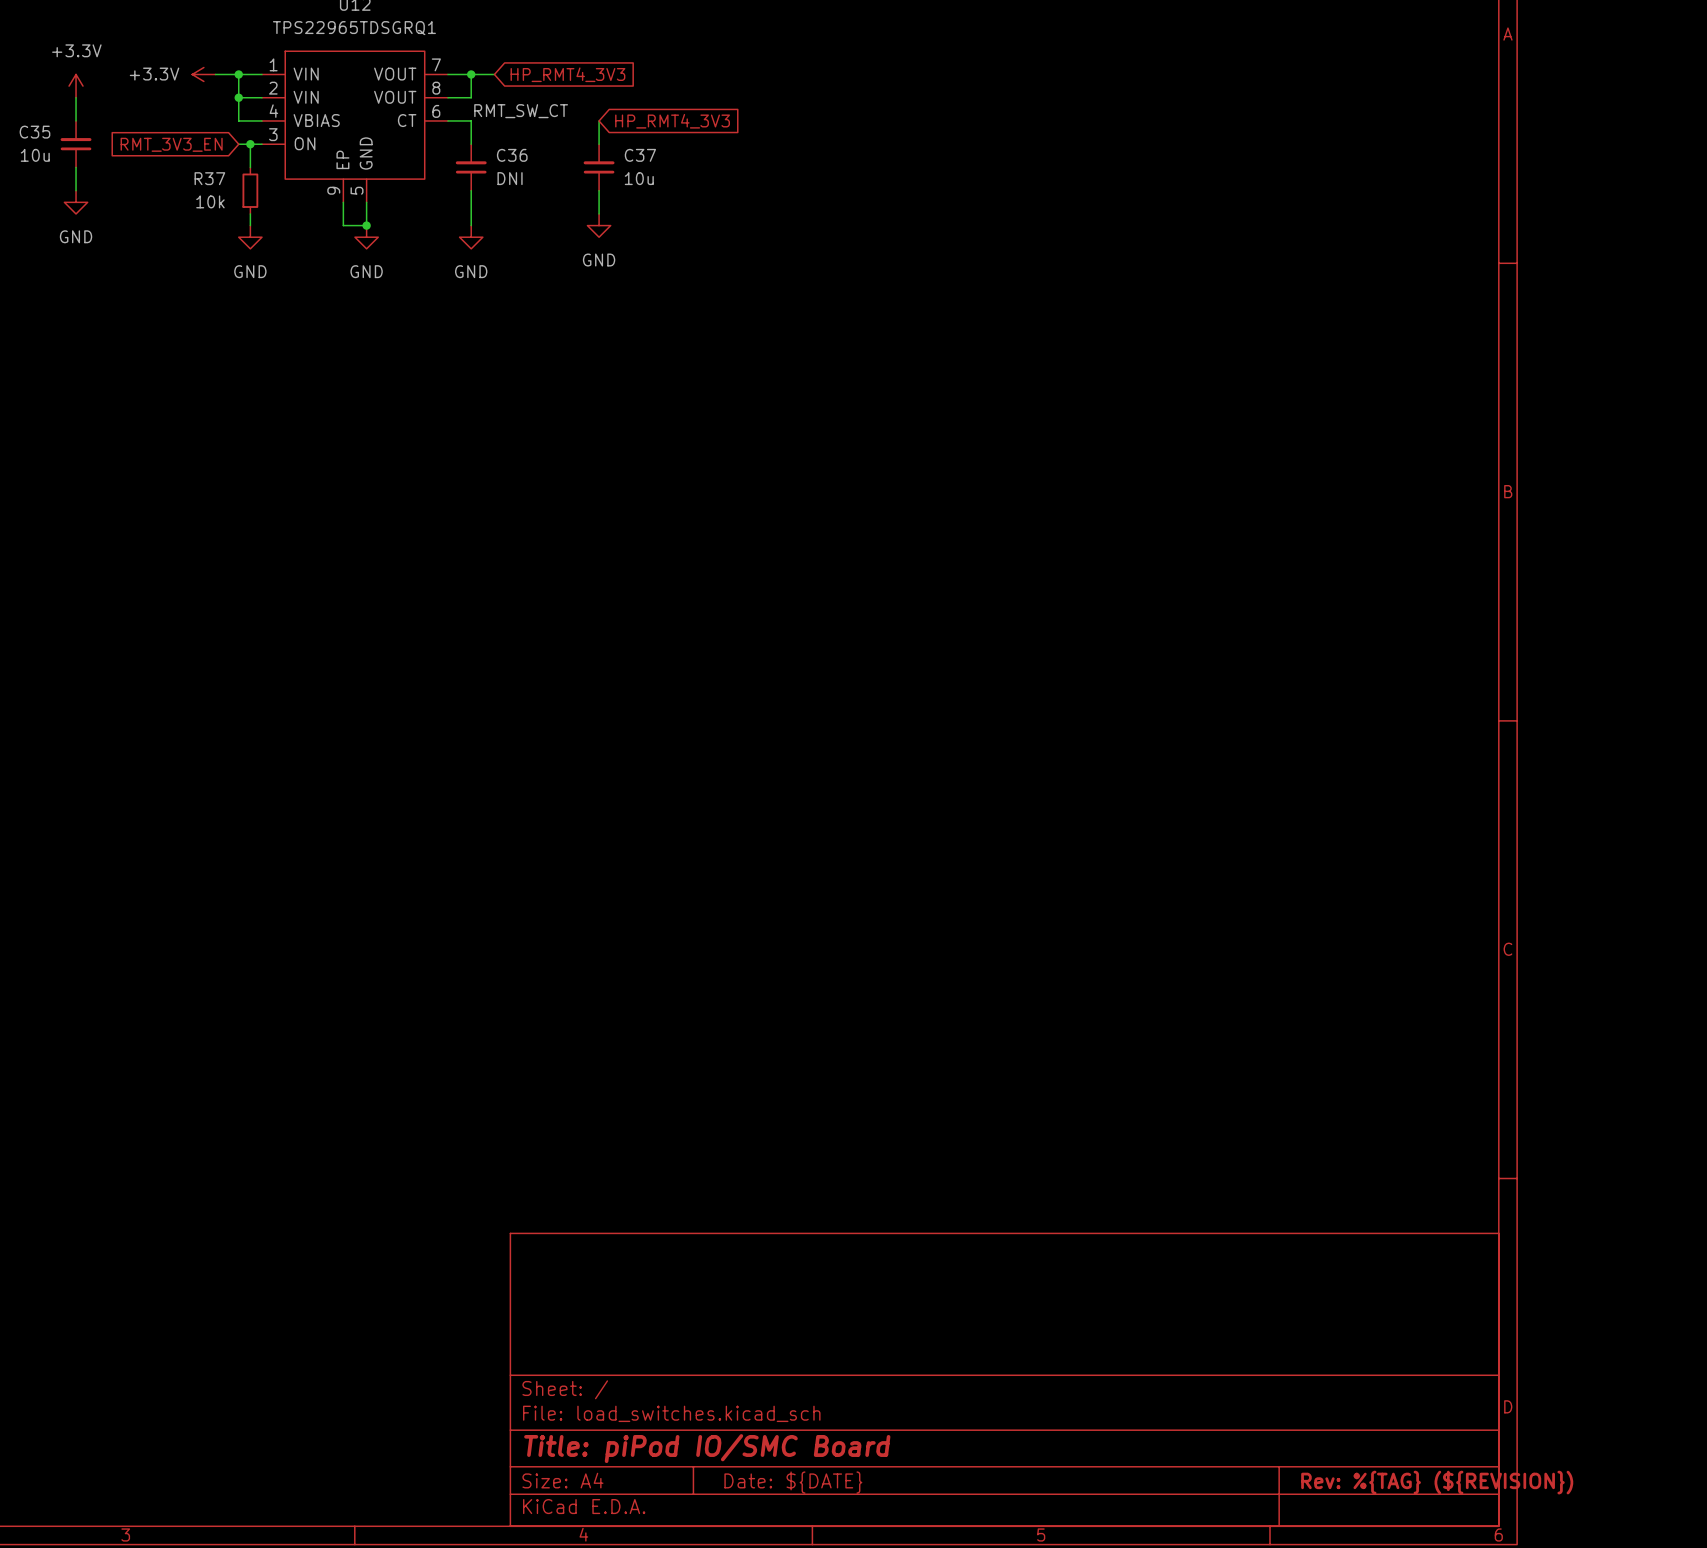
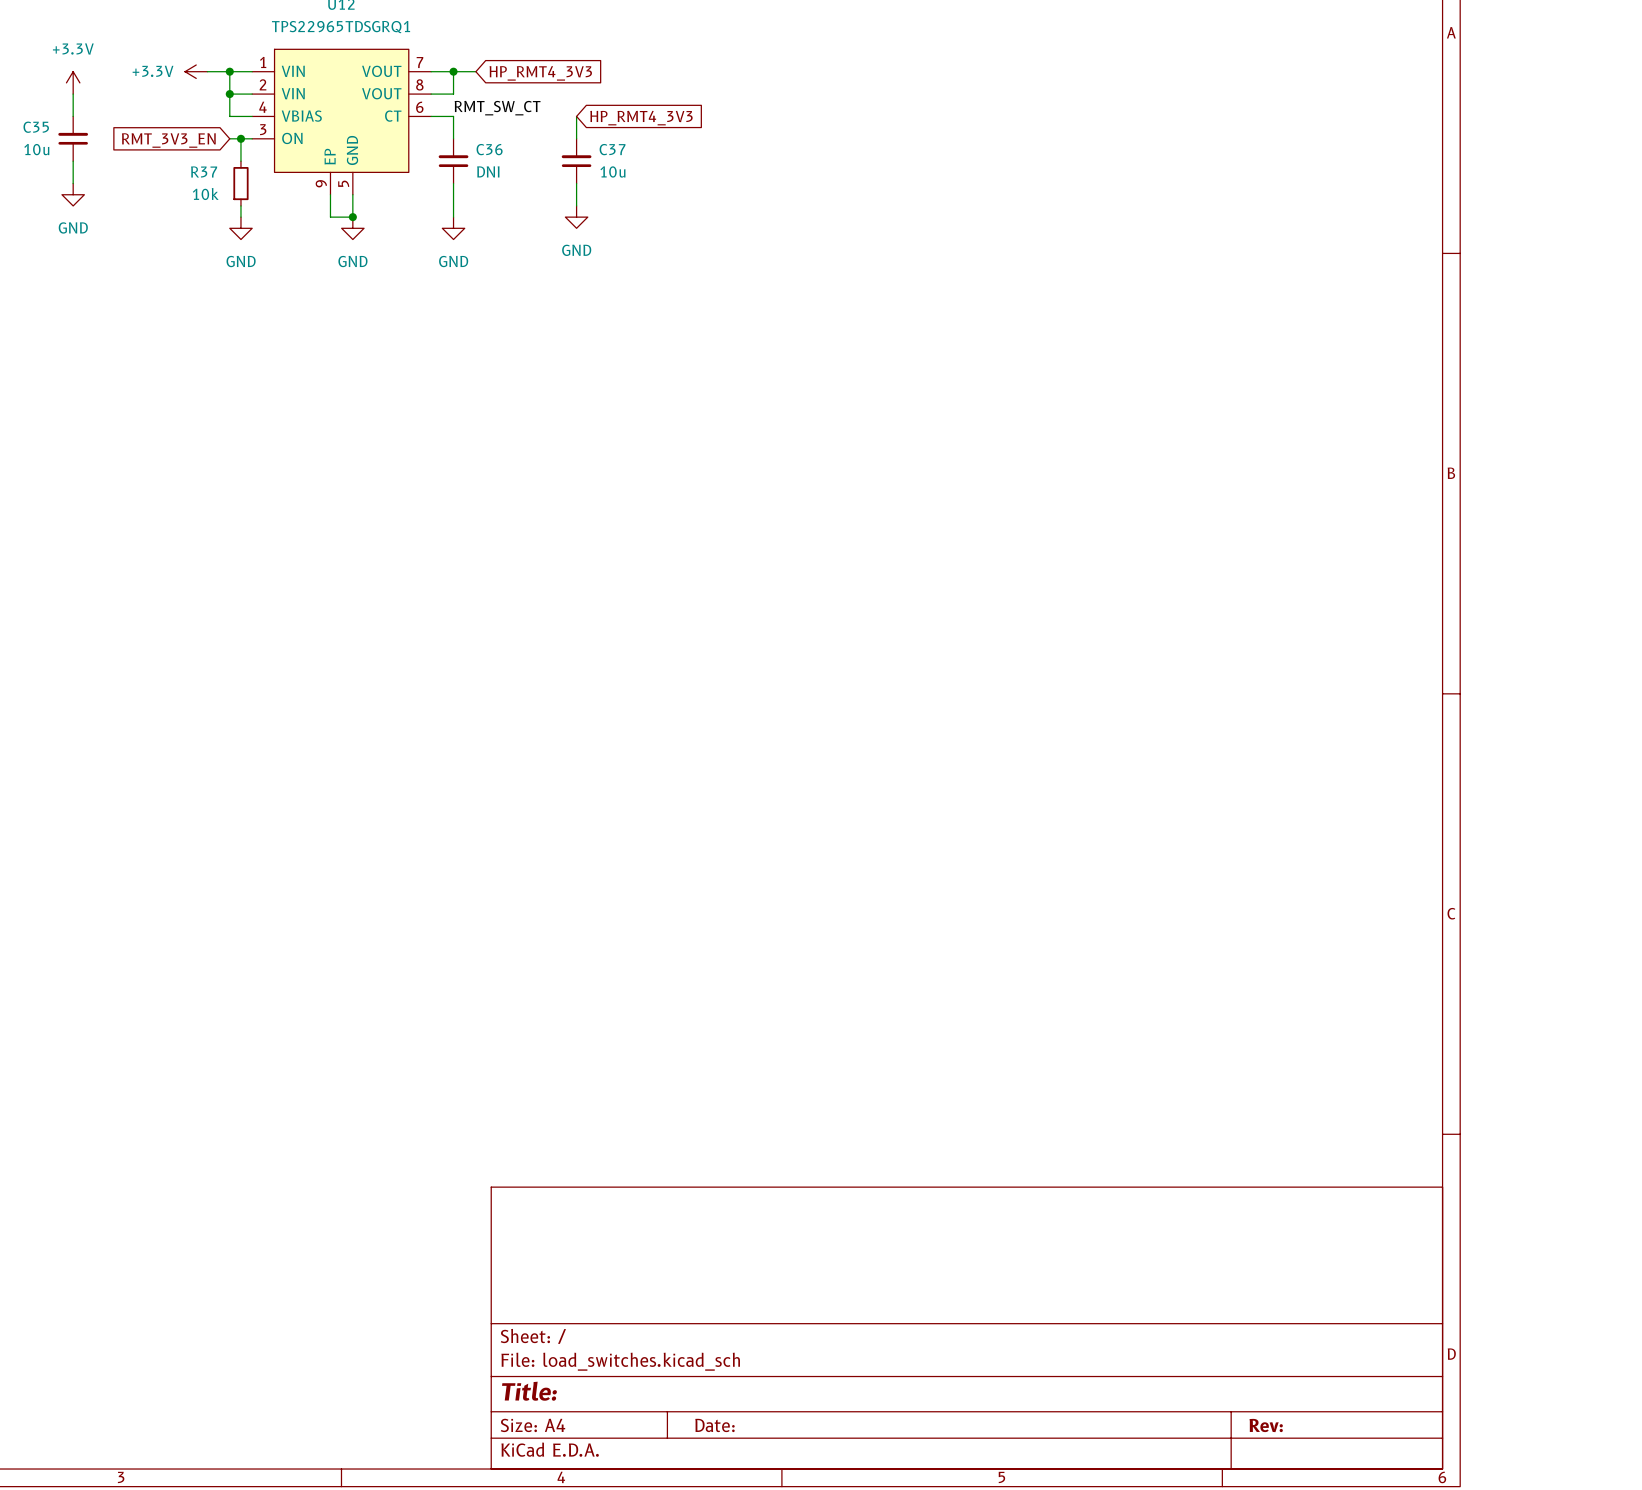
title block: Title: piPod IO/SMC Board (707, 1448) -> Title: (529, 1391)
title block: Date: ${DATE} (793, 1482) -> Date: (714, 1425)
title block: Rev: %{TAG} (${REVISION}) (1437, 1482) -> Rev: (1266, 1425)

